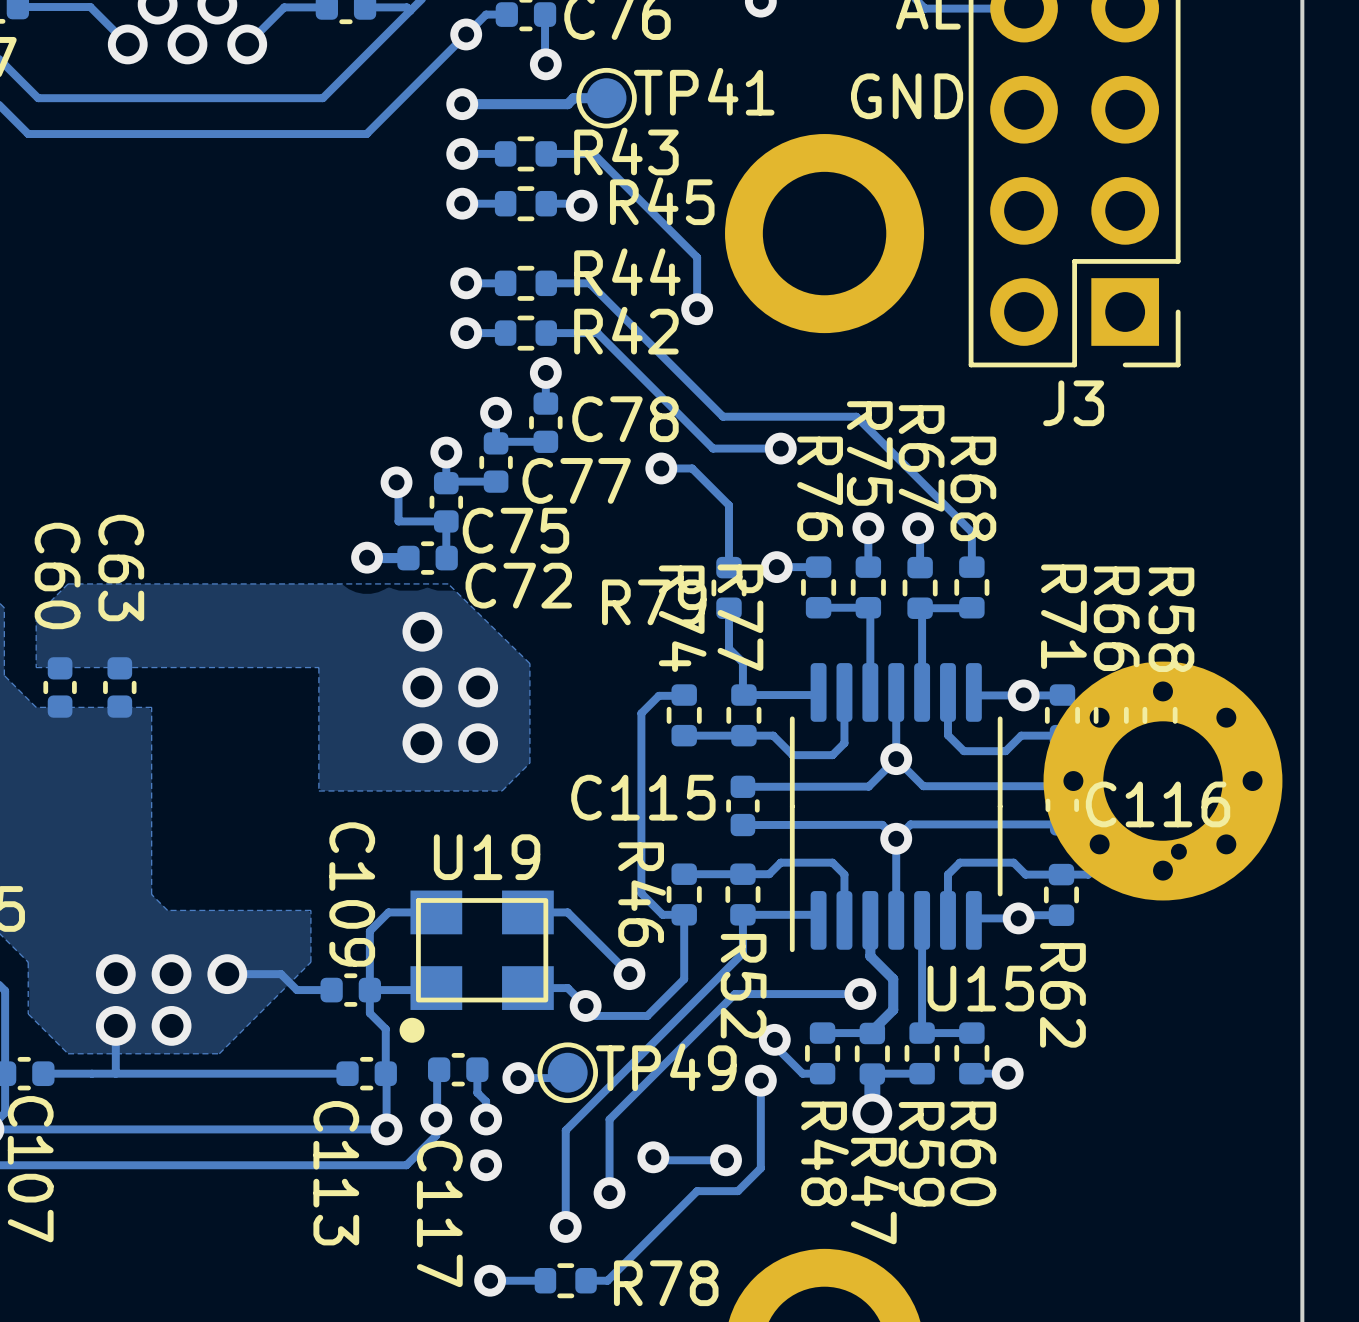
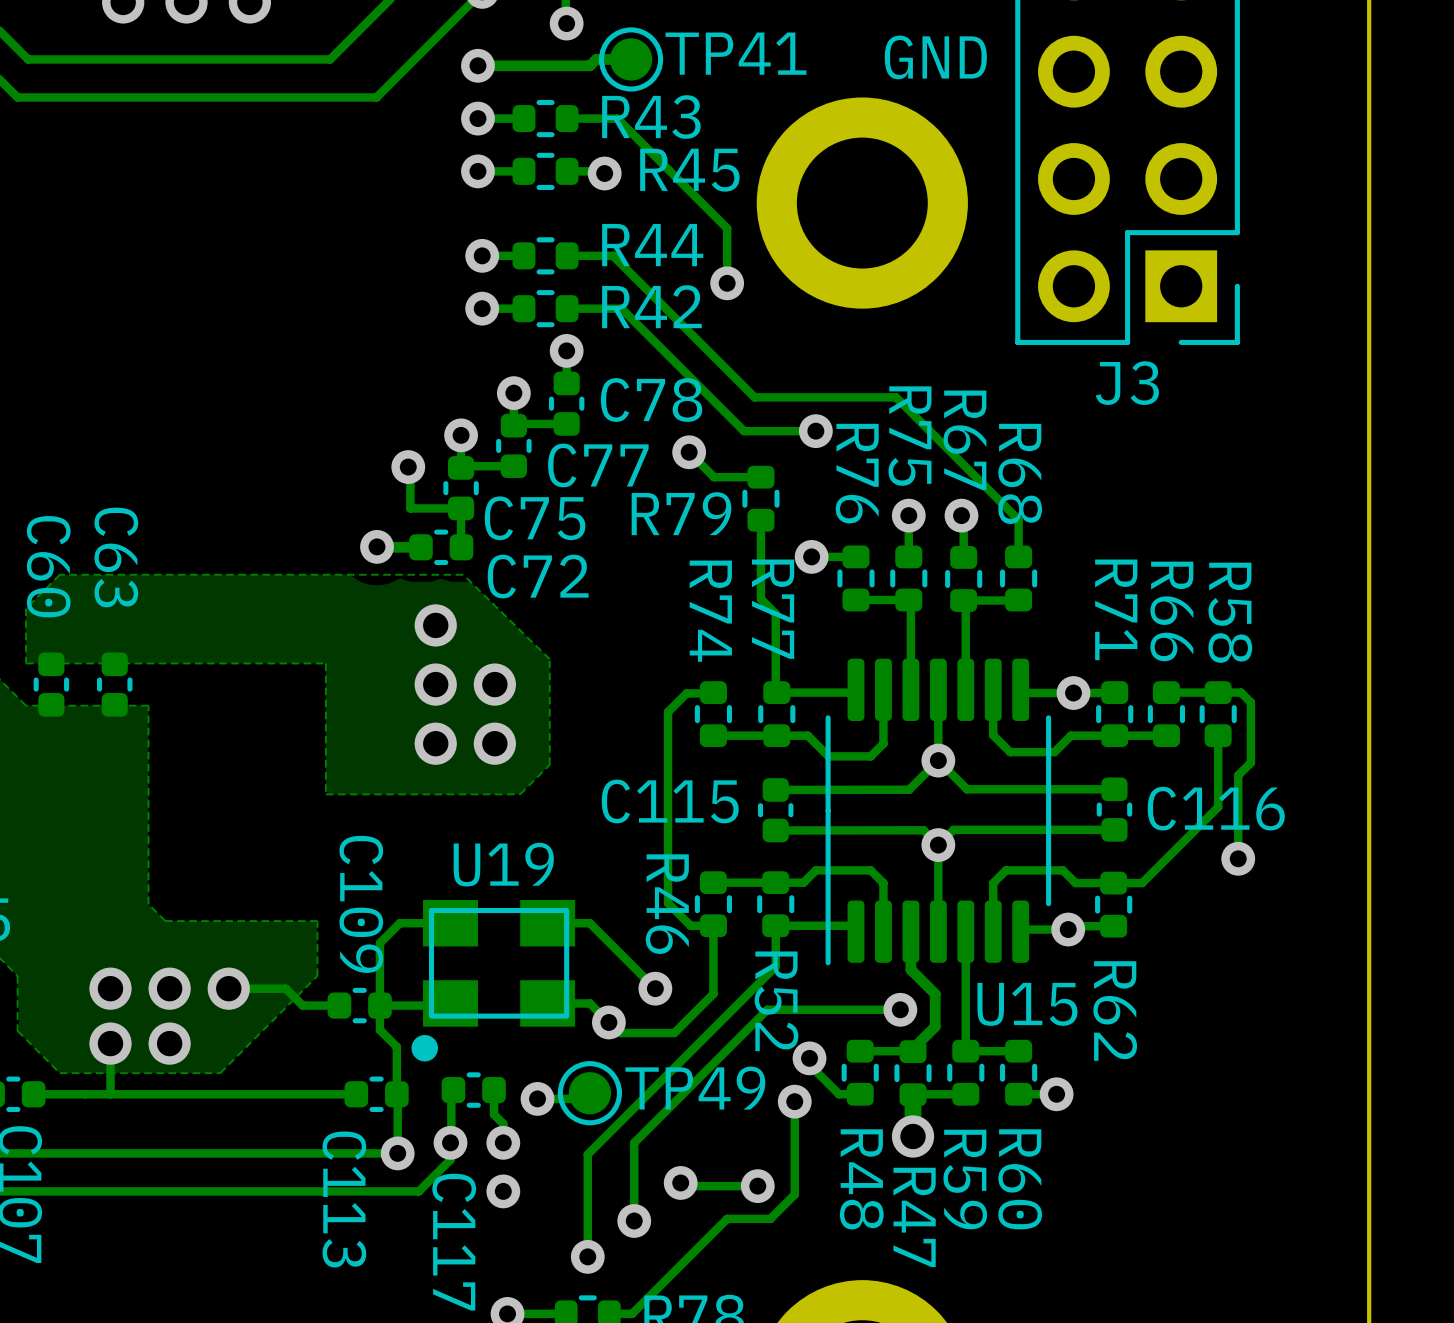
track: (661, 468) (692, 468) (728, 505) (728, 532) -> (689, 452) (714, 477) (760, 477)
R79 position: (728, 587) -> (760, 498)
track: (728, 608) (728, 648) (742, 662) -> (760, 557) (760, 599) (775, 613) (775, 658)
part: (1162, 781) -> none

